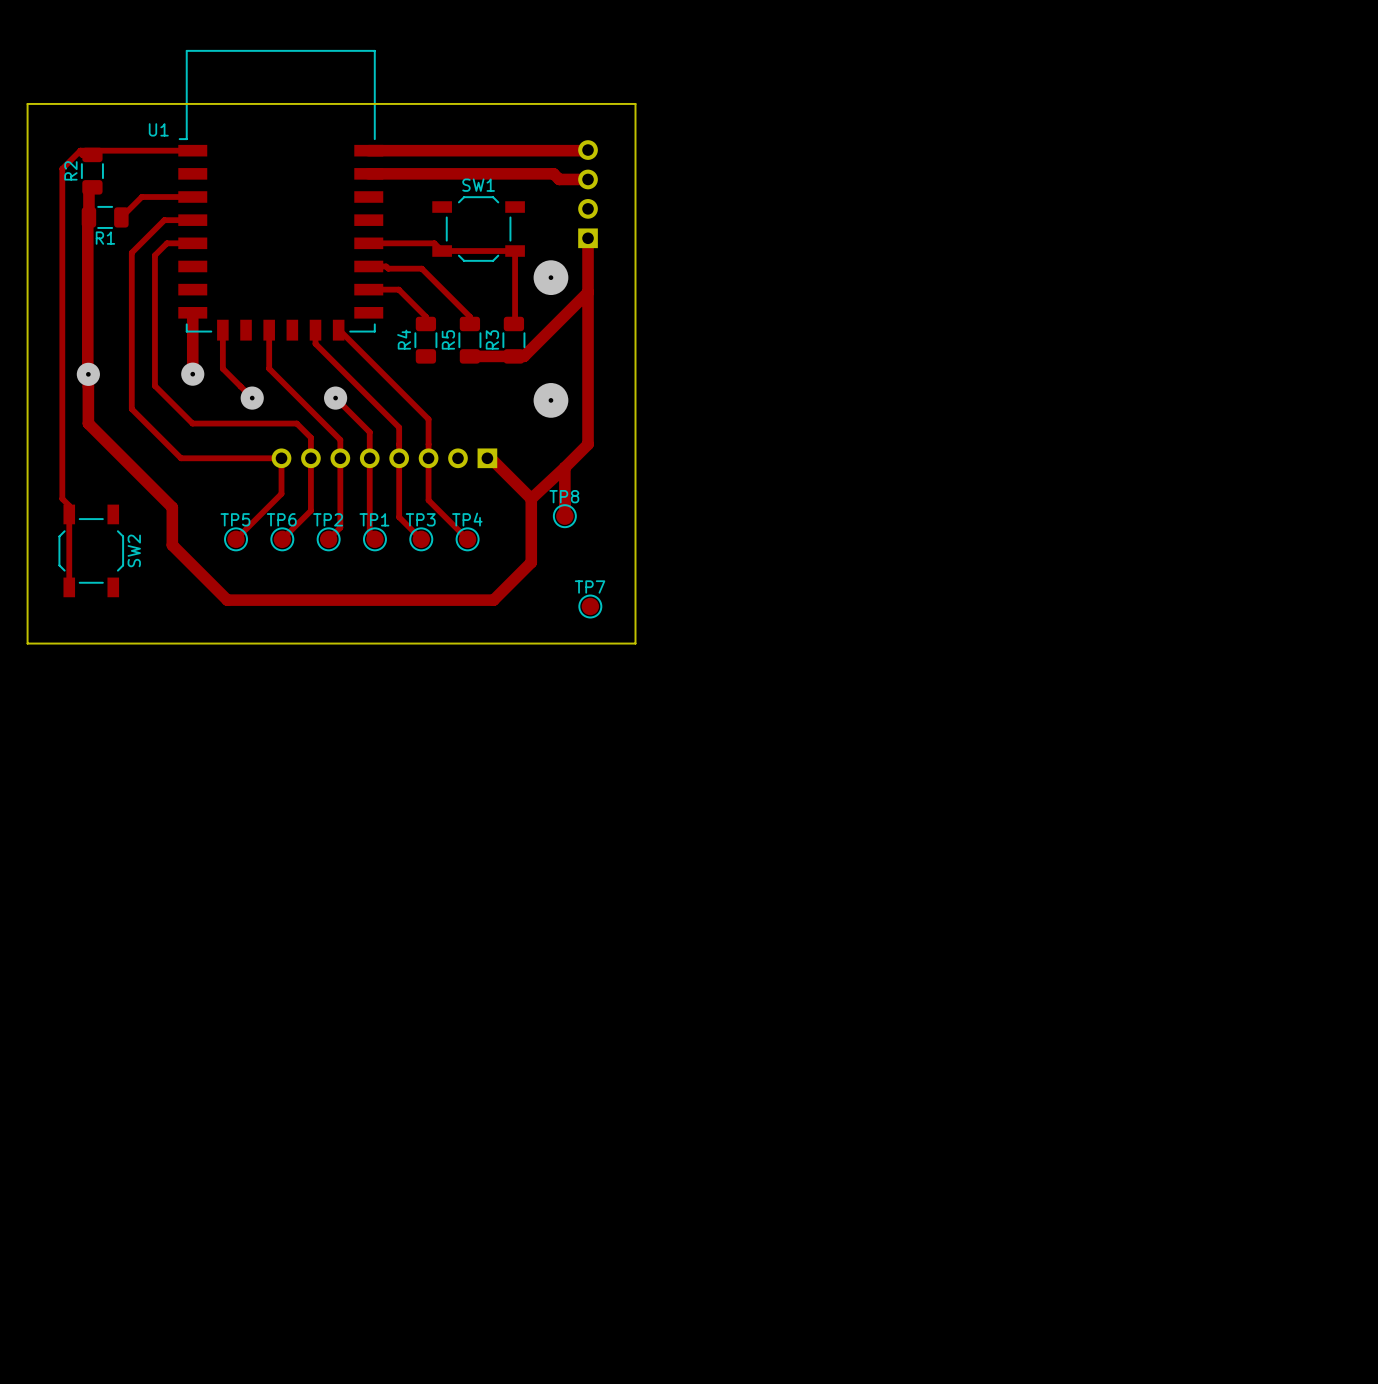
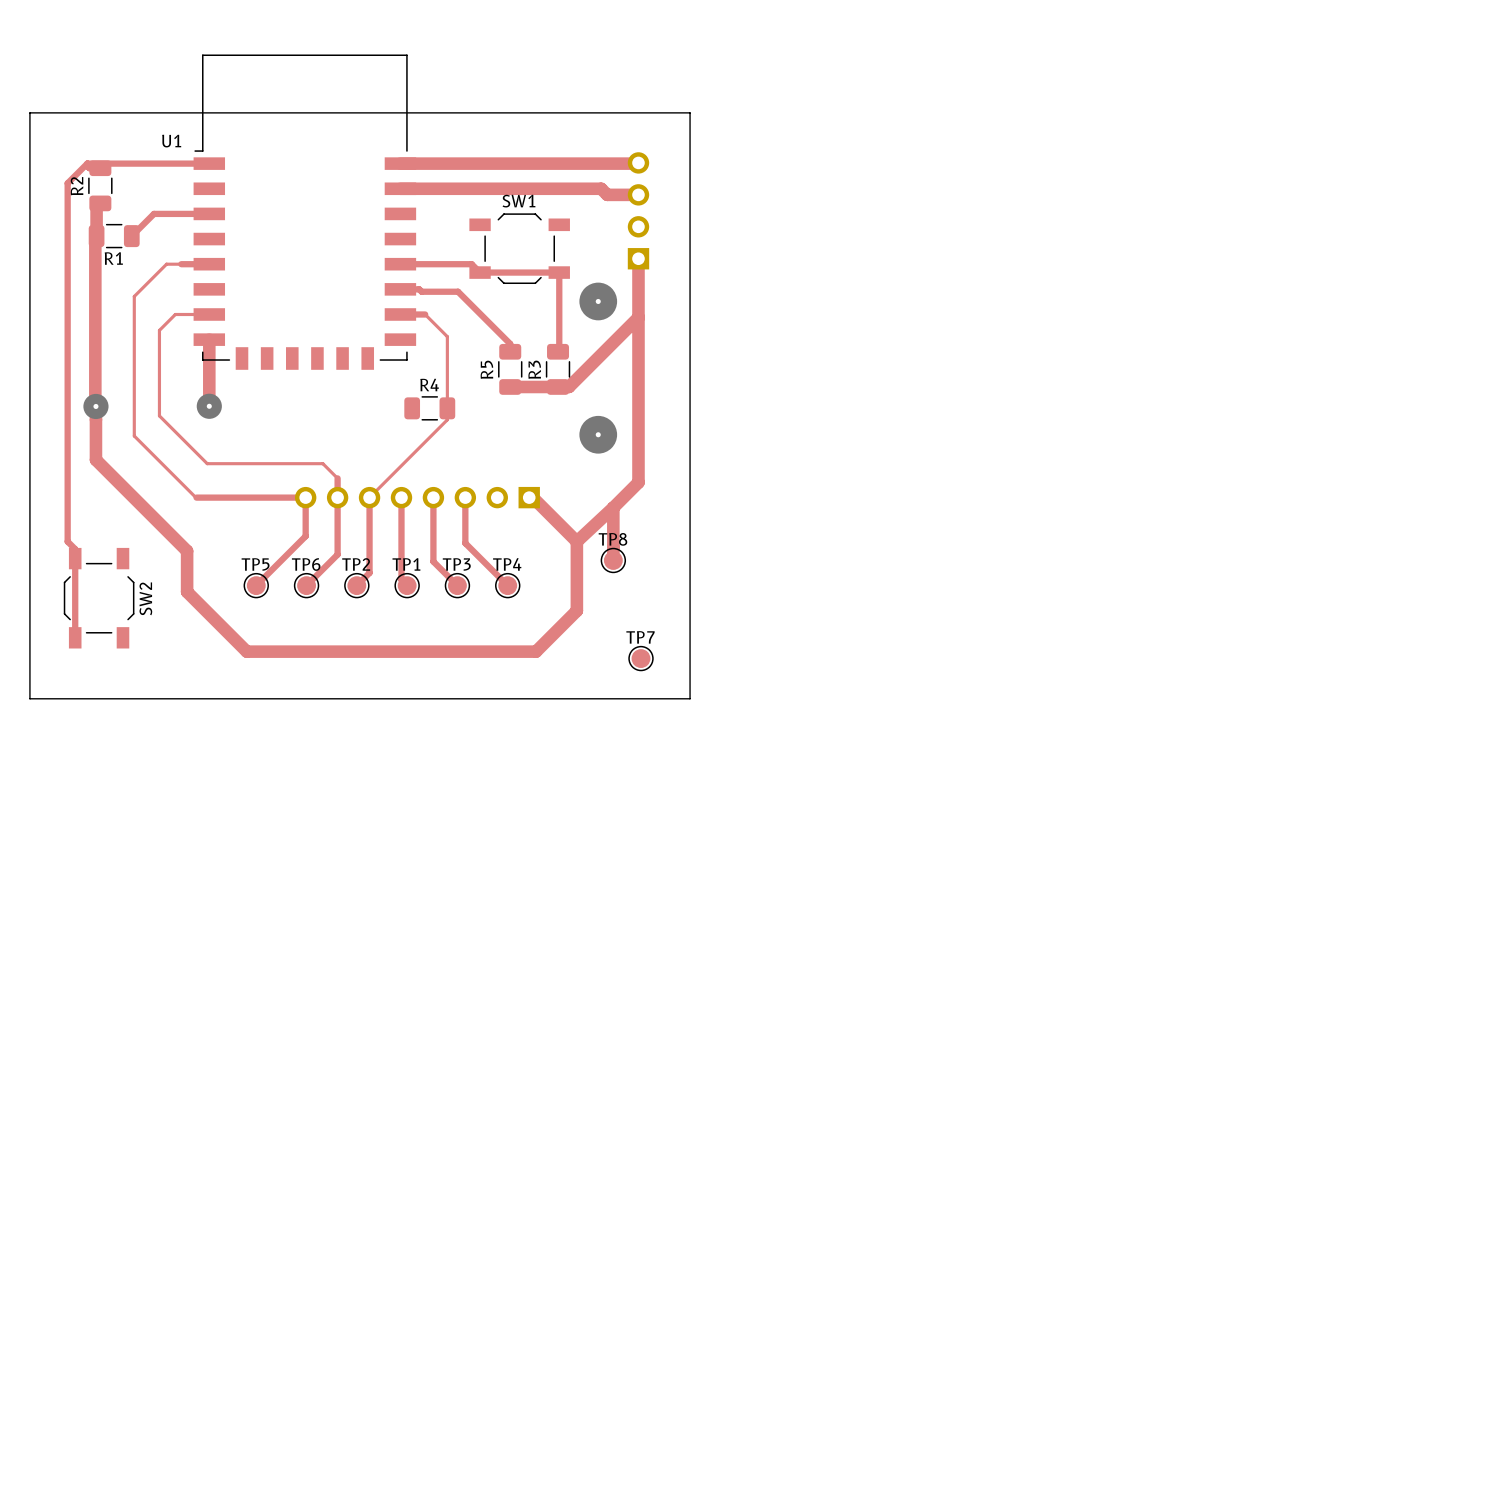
track: (192, 220) (164, 220) (131, 252) (131, 409) (181, 458) -> (181, 264) (166, 264) (134, 296) (134, 436) (196, 497)
track: (167, 243) (154, 255) (154, 385) (192, 423) (296, 423) (310, 437) (310, 440) -> (209, 314) (175, 314) (159, 330) (159, 415) (207, 463) (322, 463) (337, 478)
track: (391, 289) (398, 289) (425, 316) (425, 323) -> none
track: (222, 330) (222, 368) (252, 398) -> none
track: (269, 330) (269, 368) (340, 439) (340, 458) -> (425, 314) (447, 336) (447, 419) (369, 497)
track: (315, 330) (315, 343) (399, 427) (399, 458) -> none
track: (338, 330) (428, 419) (428, 458) -> none
R4 rotation: 0° (425, 340) -> 90° clockwise (429, 408)
R4 position: (425, 340) -> (429, 408)
via: (252, 398) -> none
track: (335, 398) (369, 432) (369, 458) -> none
via: (335, 398) -> none

